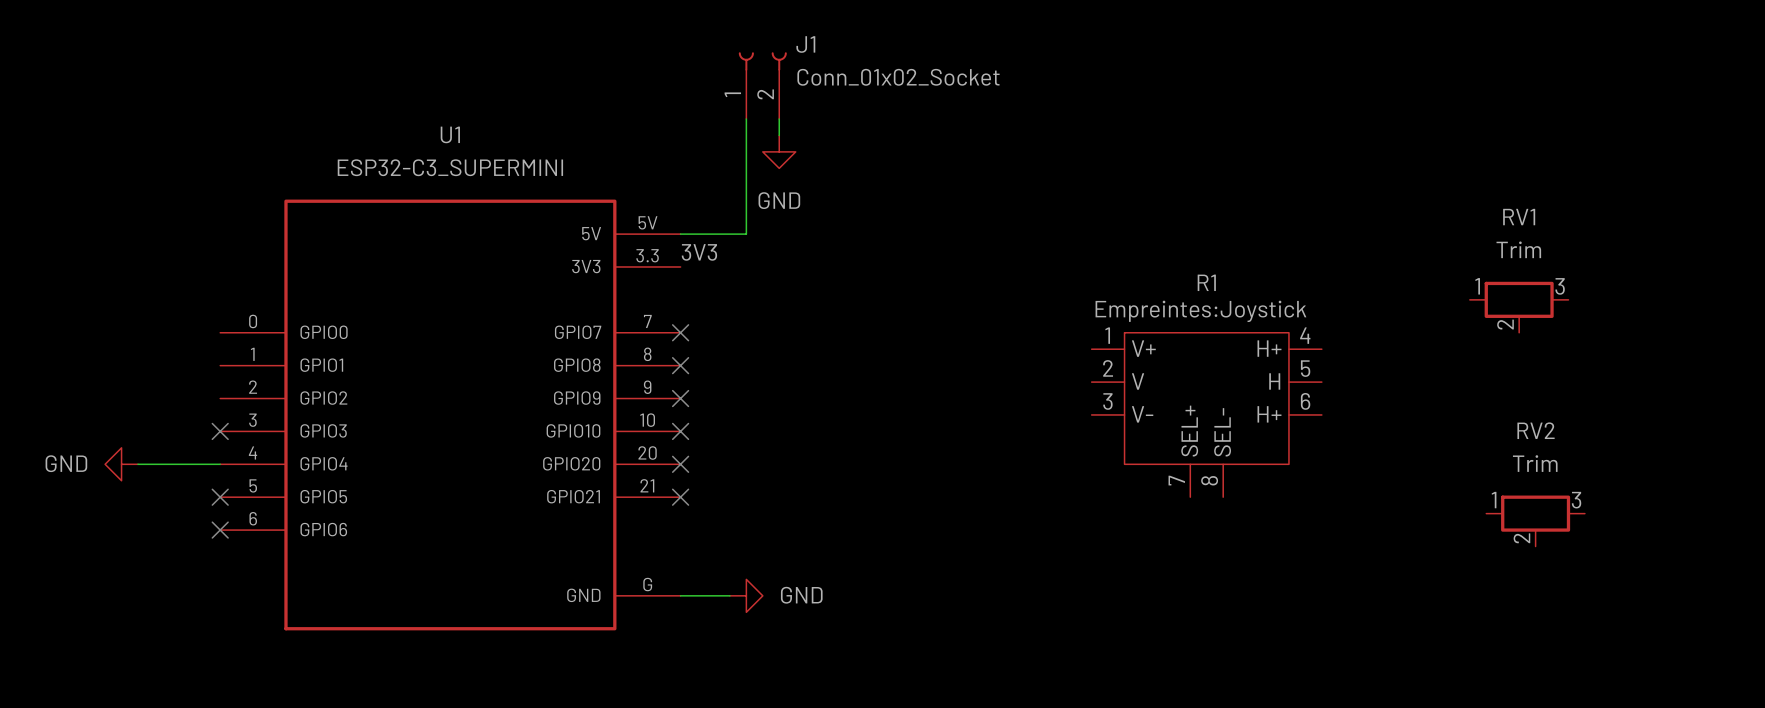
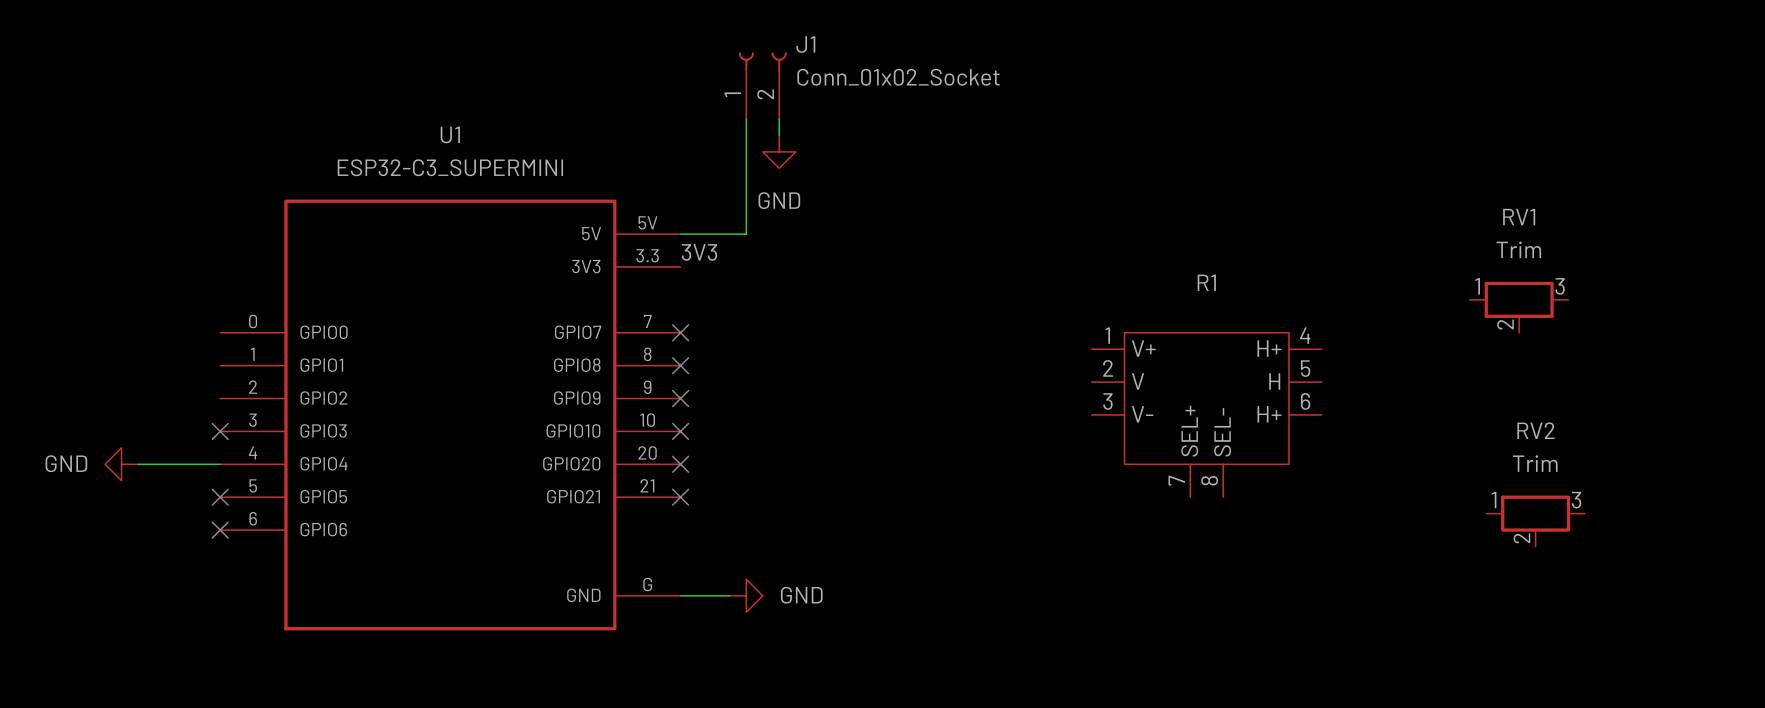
R1 text: Empreintes:Joystick (1200, 311) -> none

